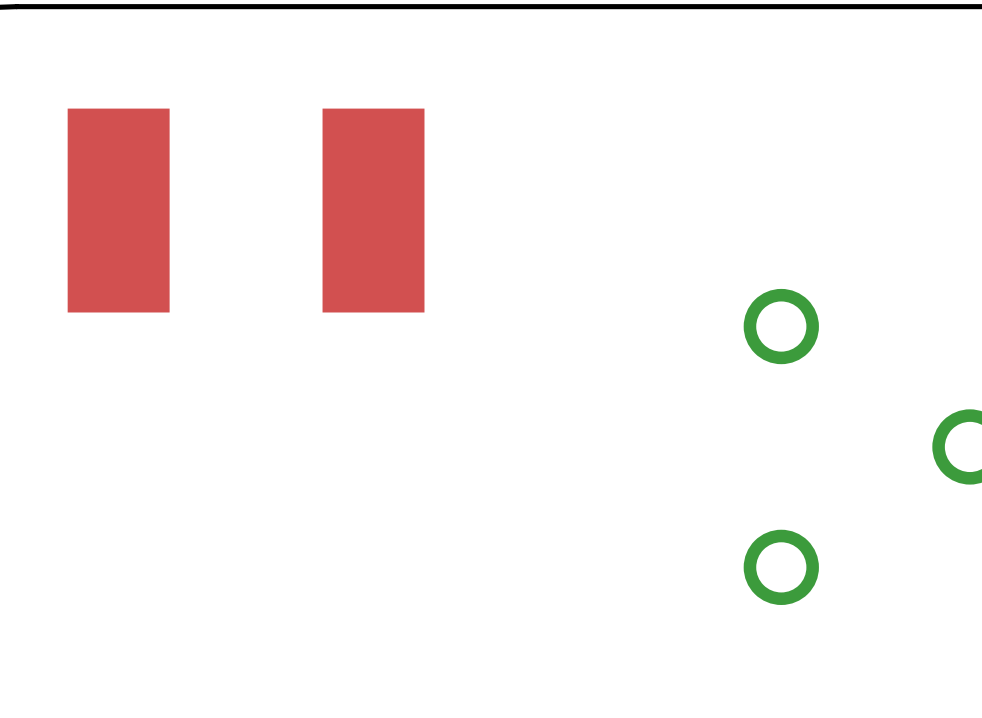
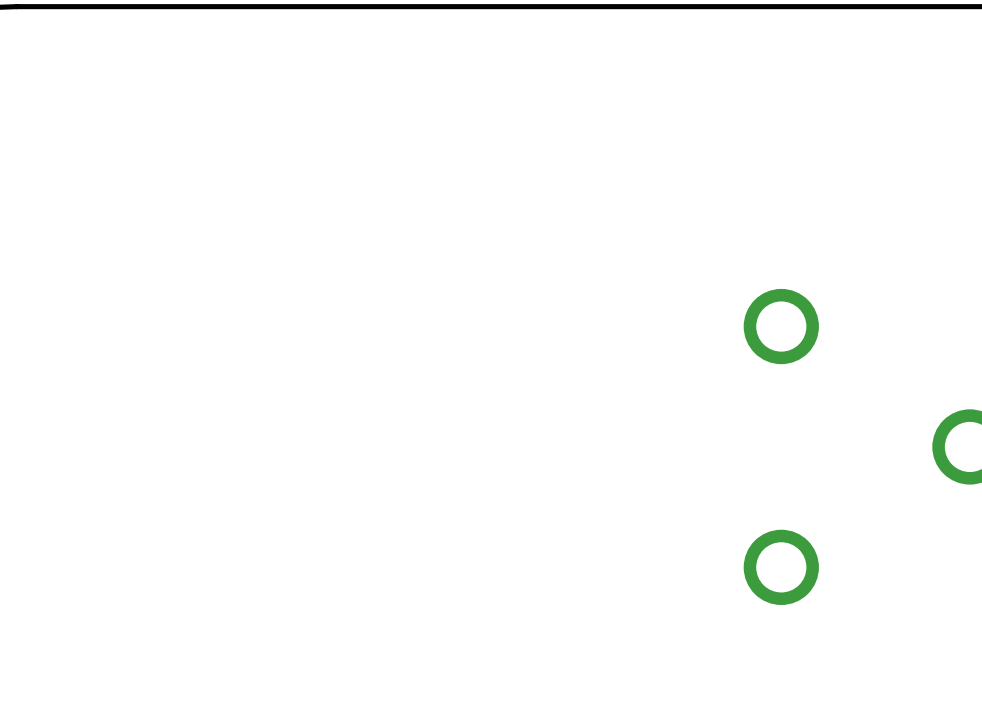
part: (118, 210) -> none
part: (373, 210) -> none

